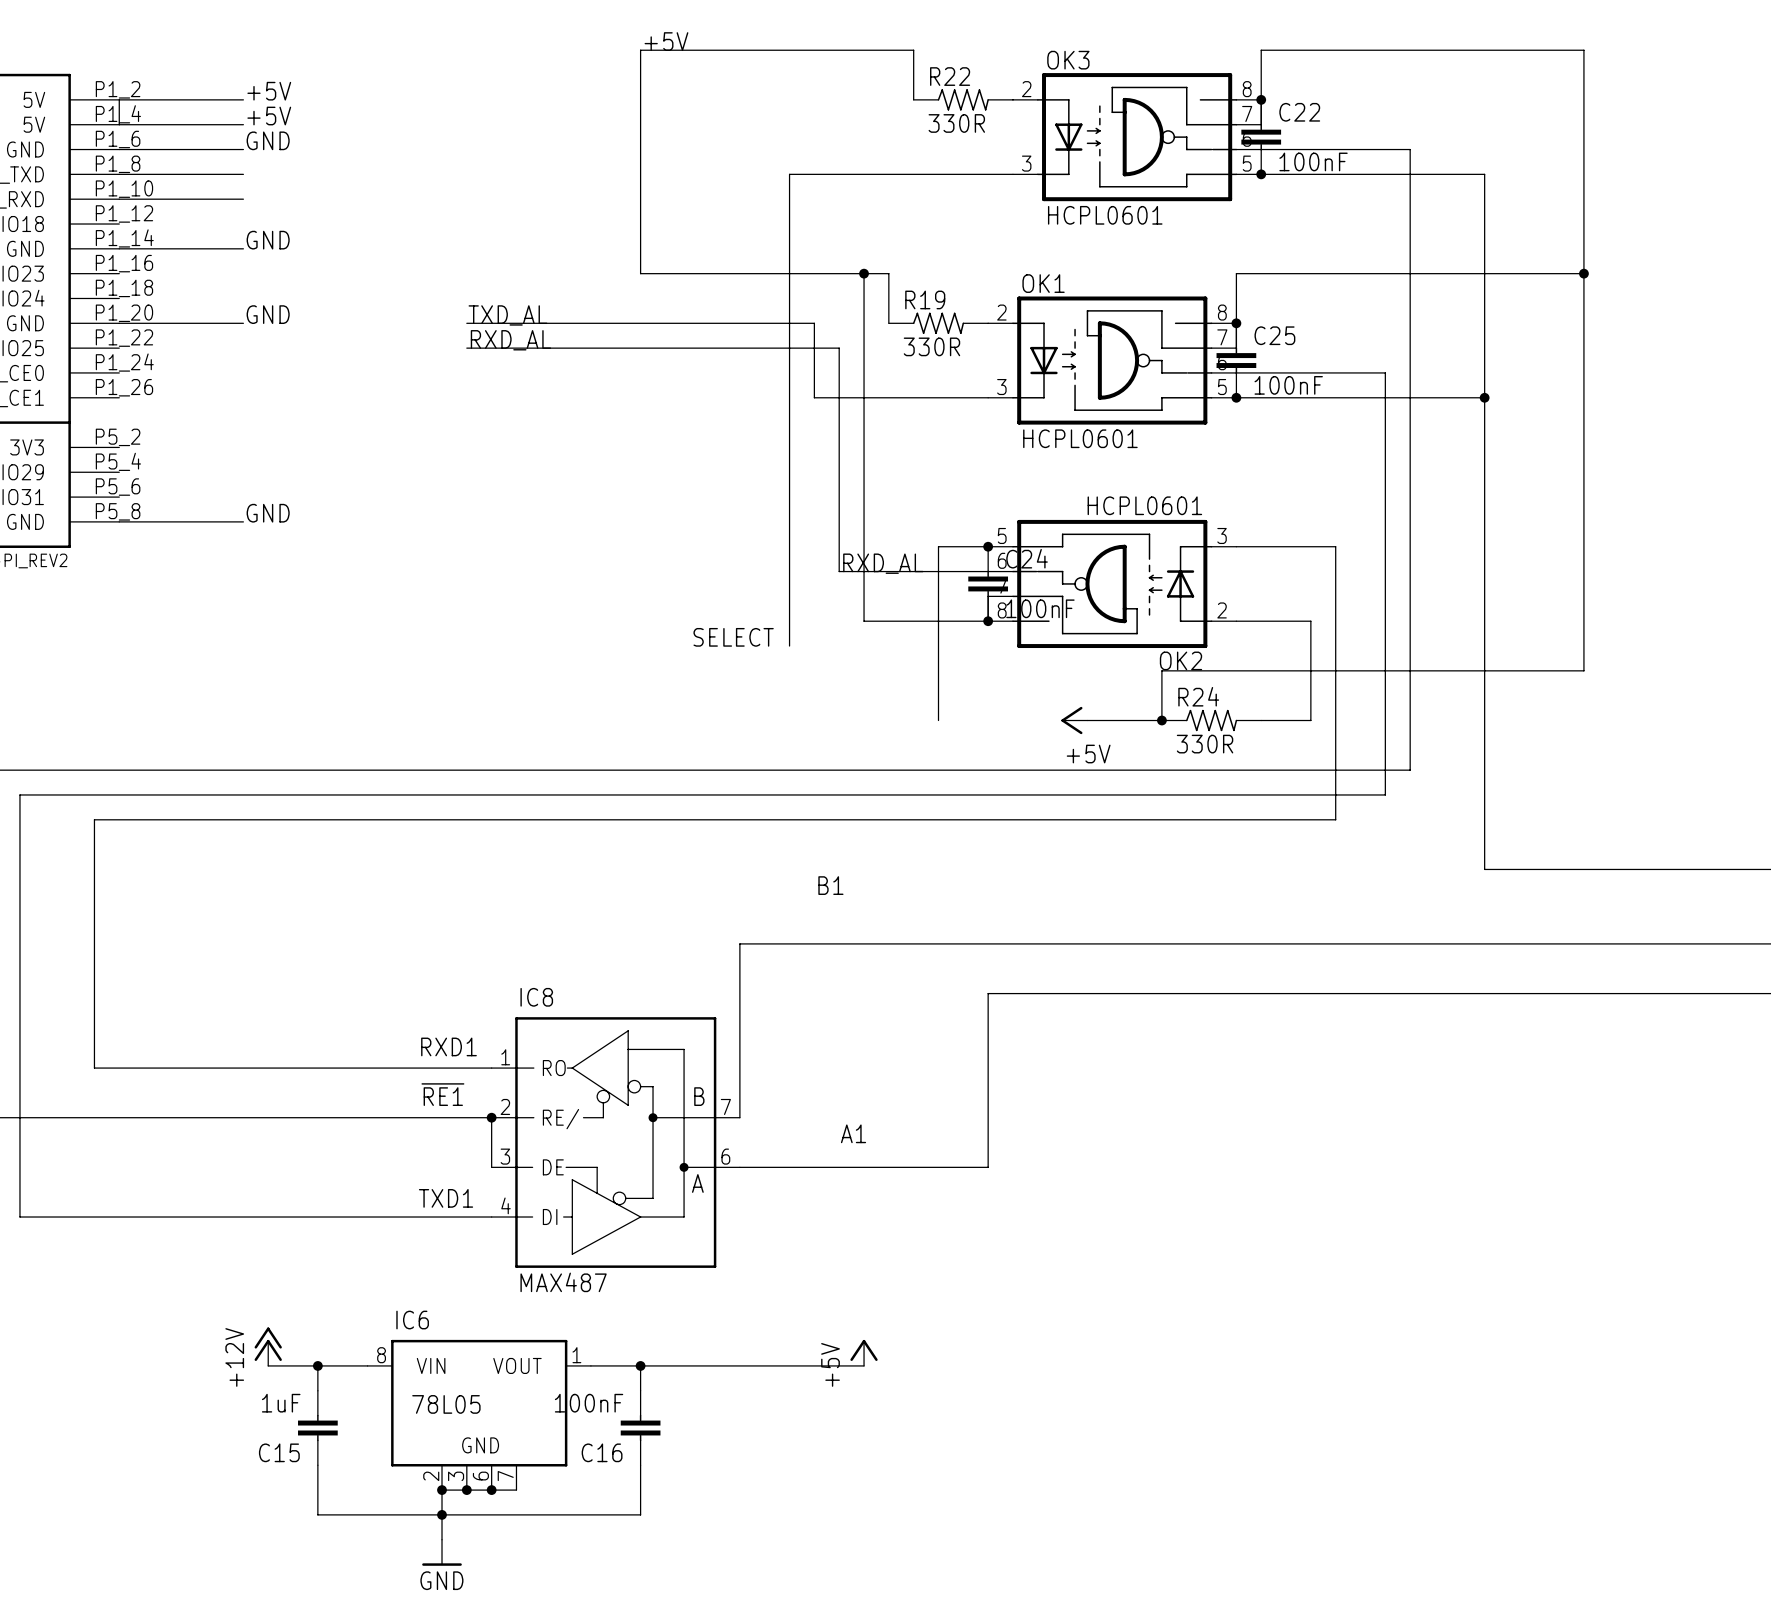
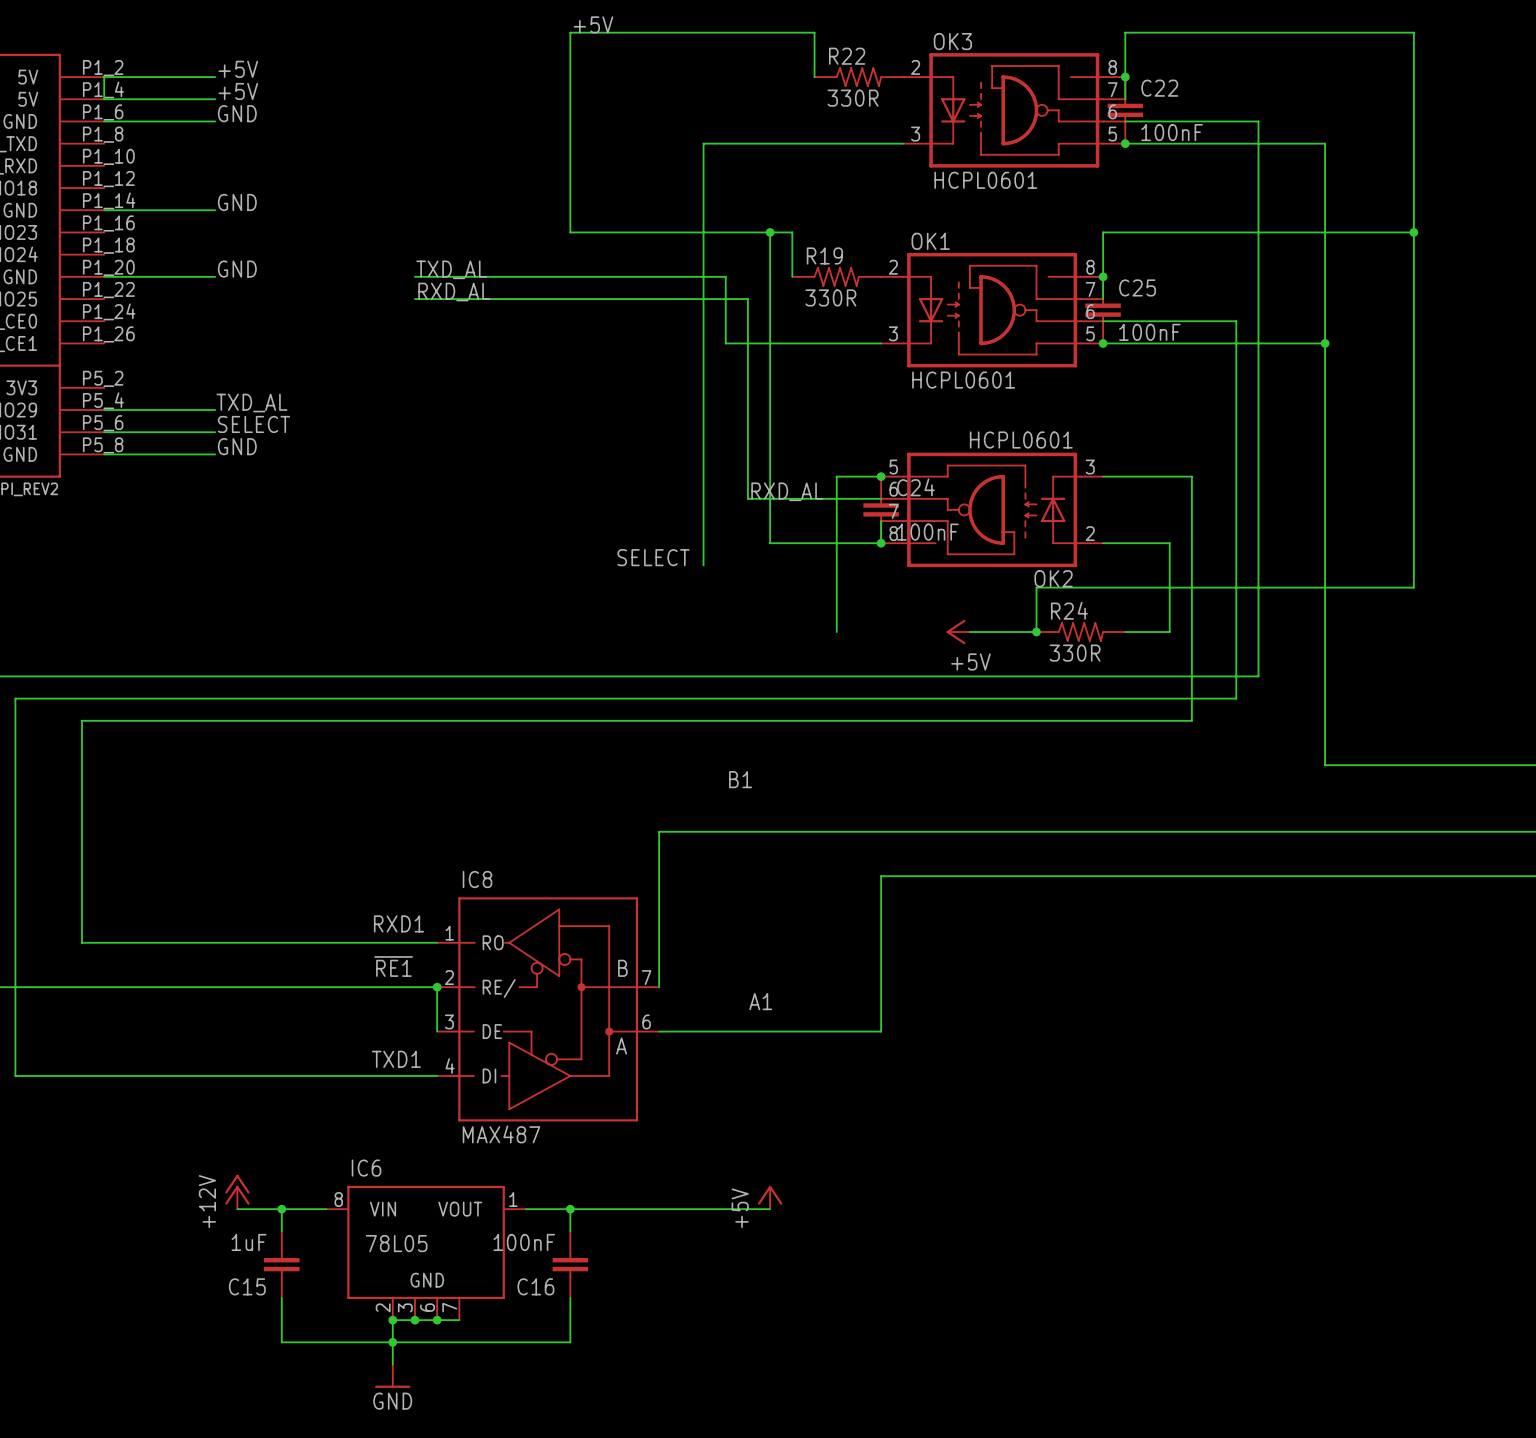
wire: (119, 174) (243, 174) -> none
wire: (119, 199) (243, 199) -> none
label: none -> TXD_AL (251, 403)
wire: none -> (104, 410) (215, 410)
label: none -> SELECT (253, 424)
wire: none -> (104, 432) (215, 432)

